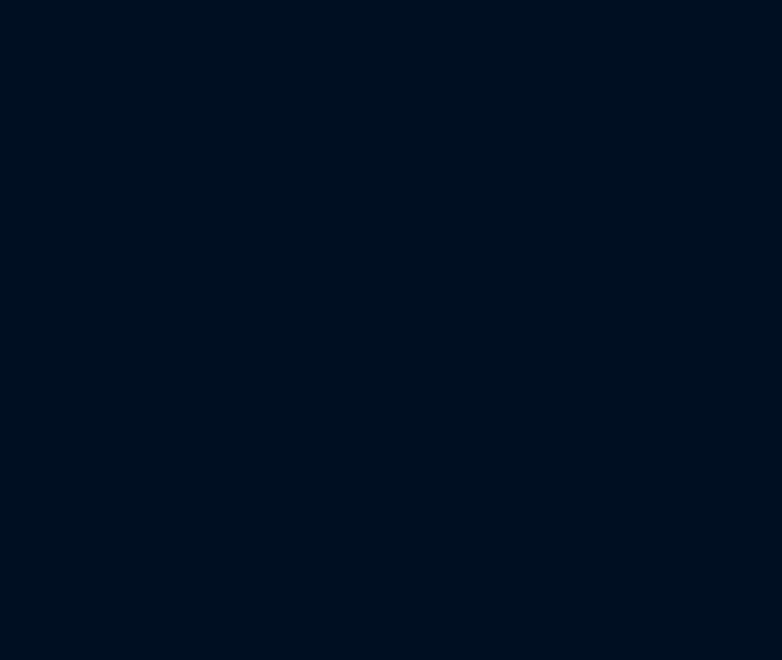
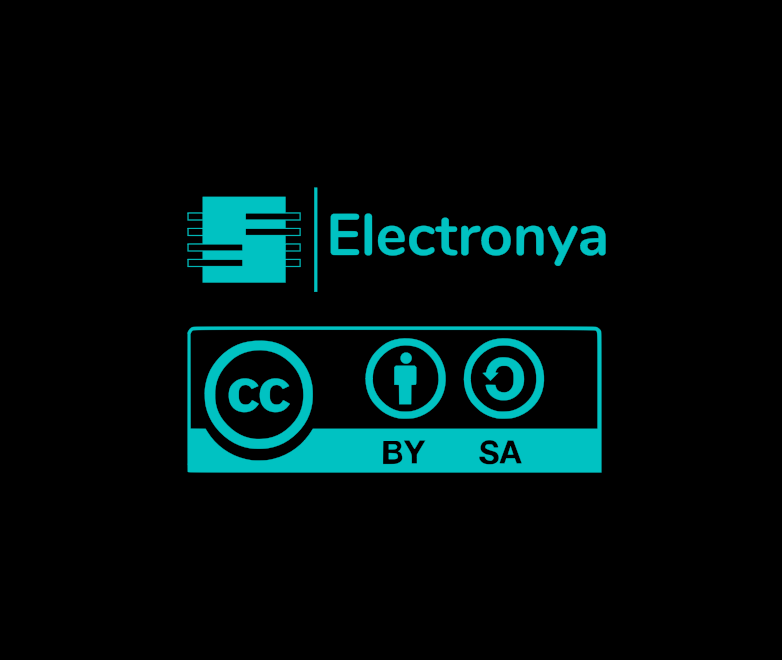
drawing: none -> [187, 187, 606, 473]

